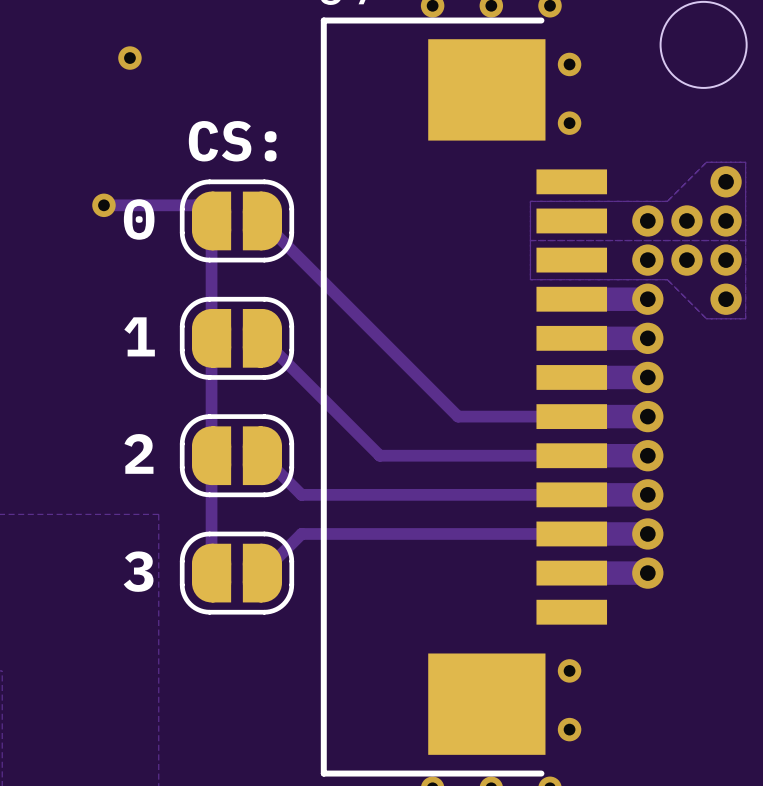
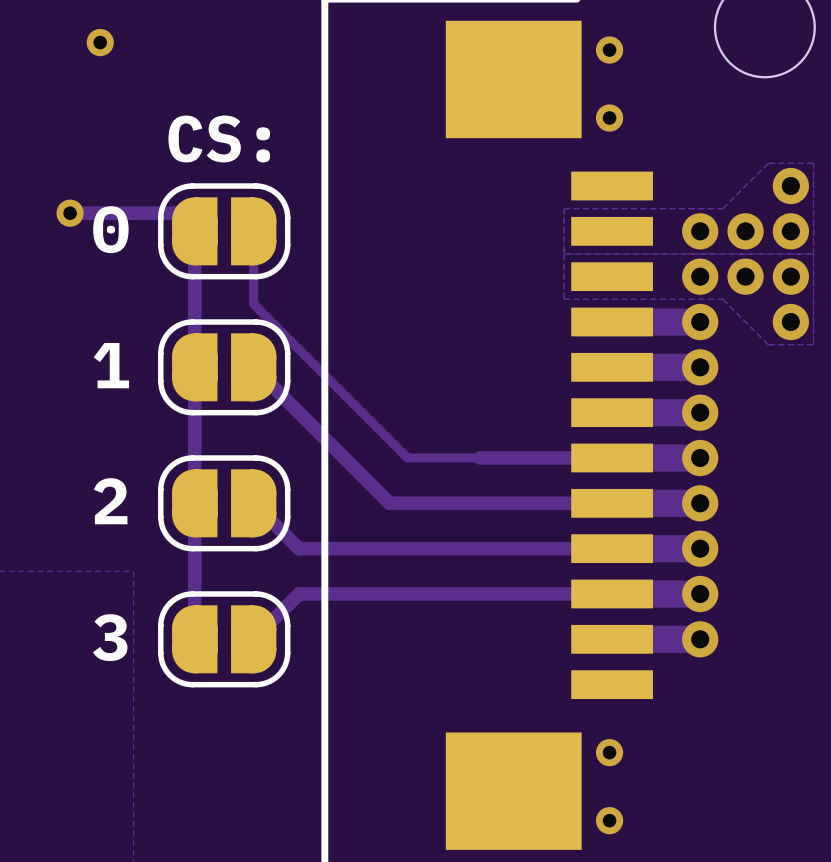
track: (262, 220) (458, 416) -> (253, 231) (253, 304) (407, 458) (480, 458)

